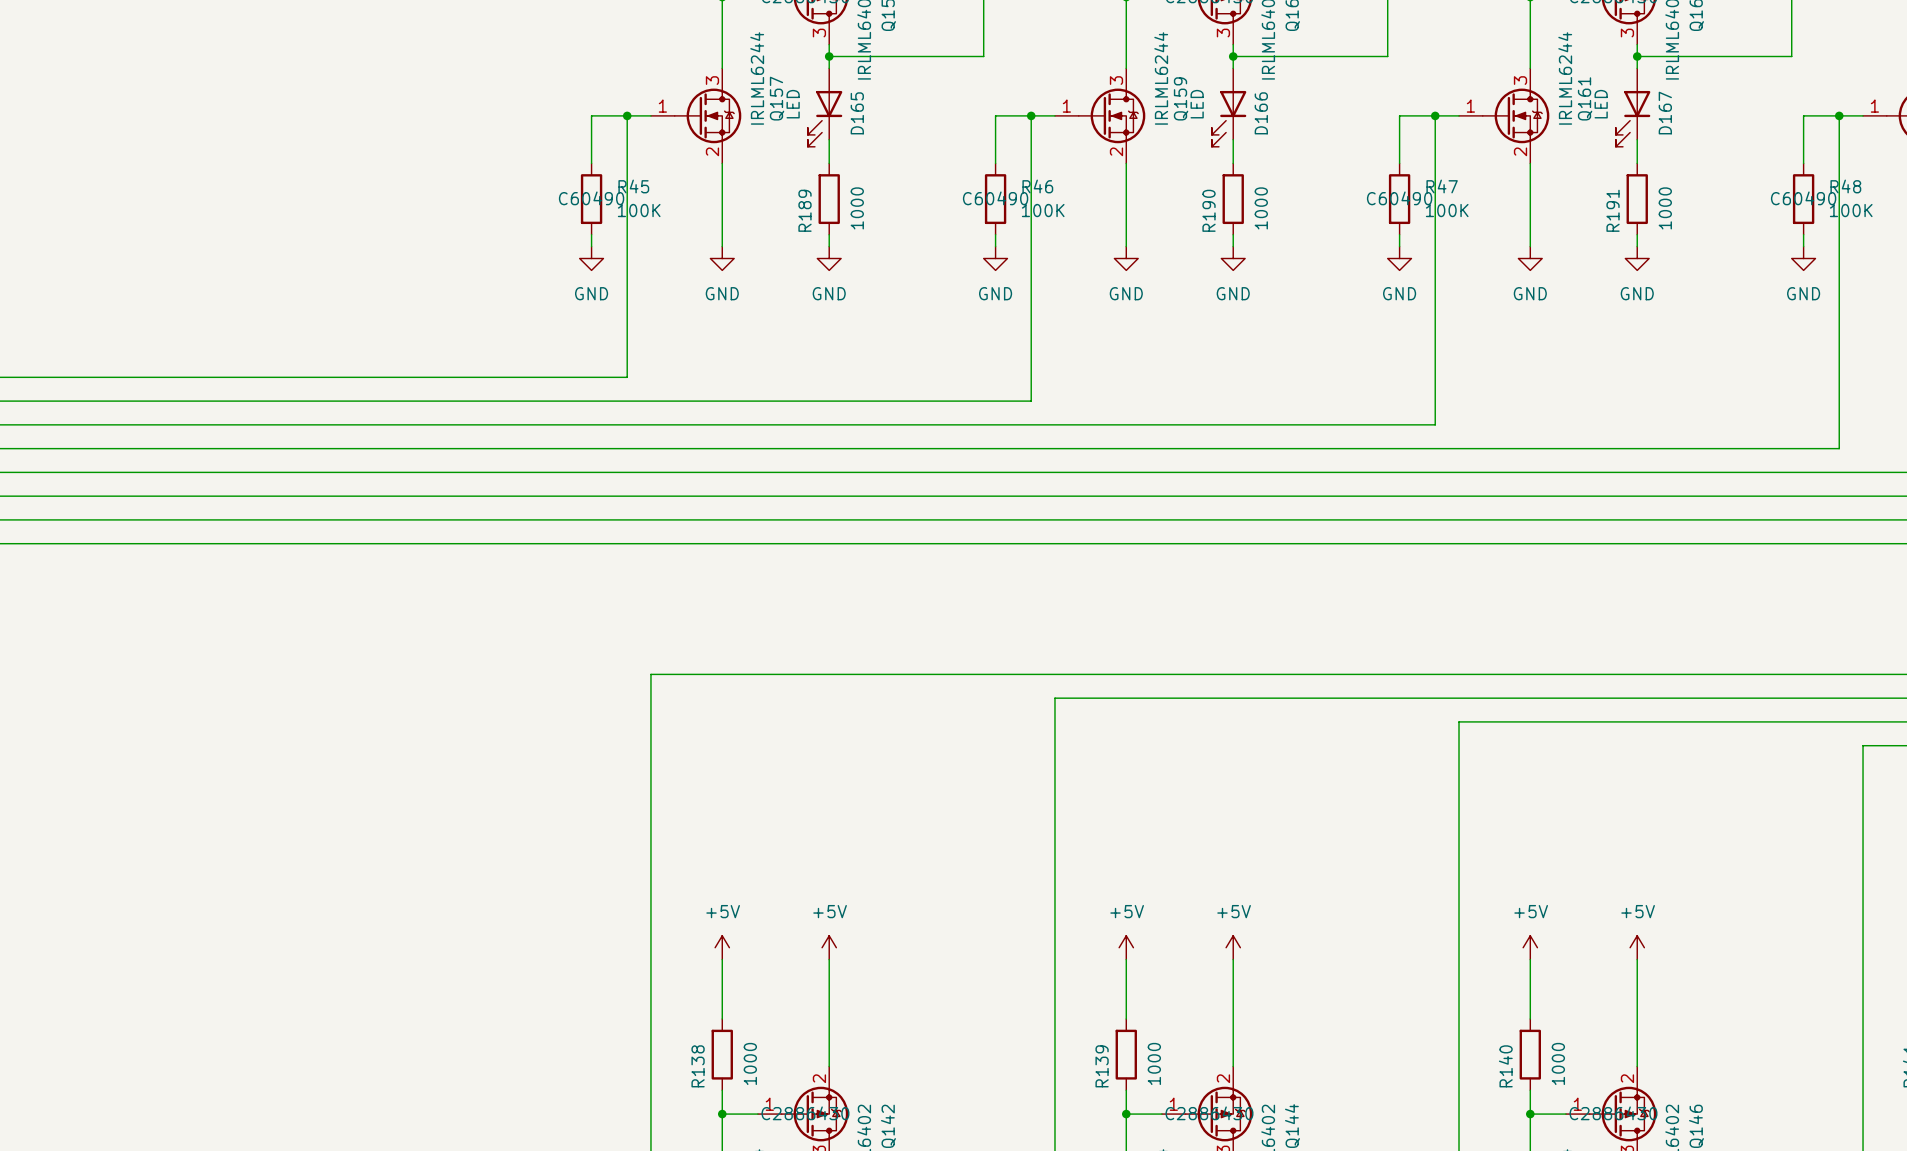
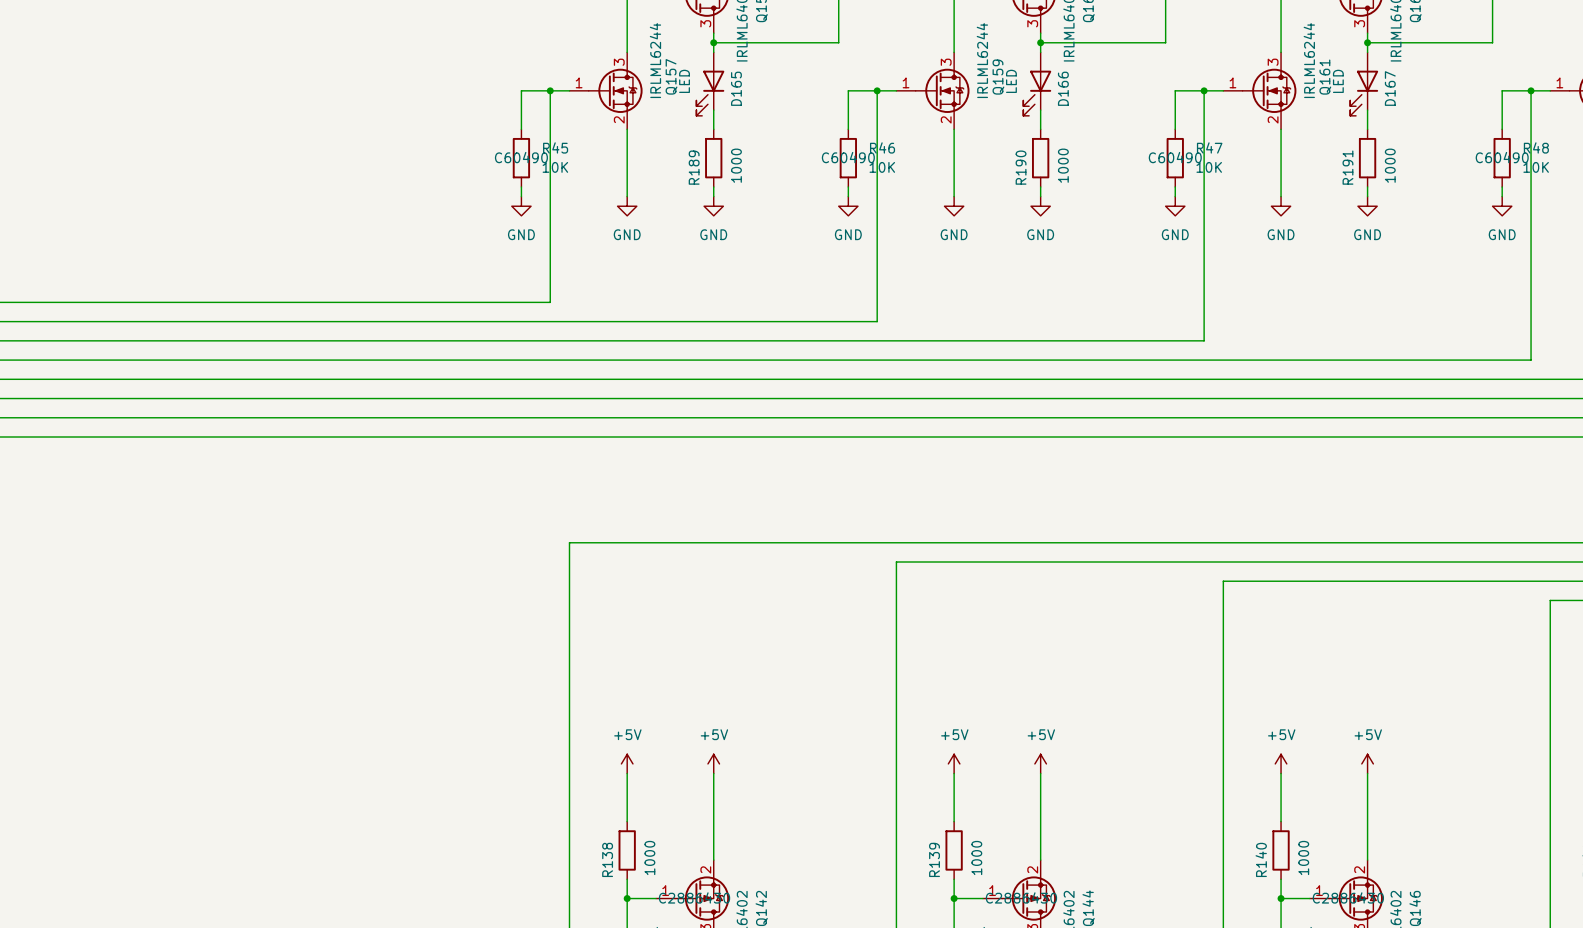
R45 value: 100K (639, 210) -> 10K (555, 167)
R46 value: 100K (1043, 210) -> 10K (882, 167)
R47 value: 100K (1447, 210) -> 10K (1209, 167)
R48 value: 100K (1851, 210) -> 10K (1536, 167)

